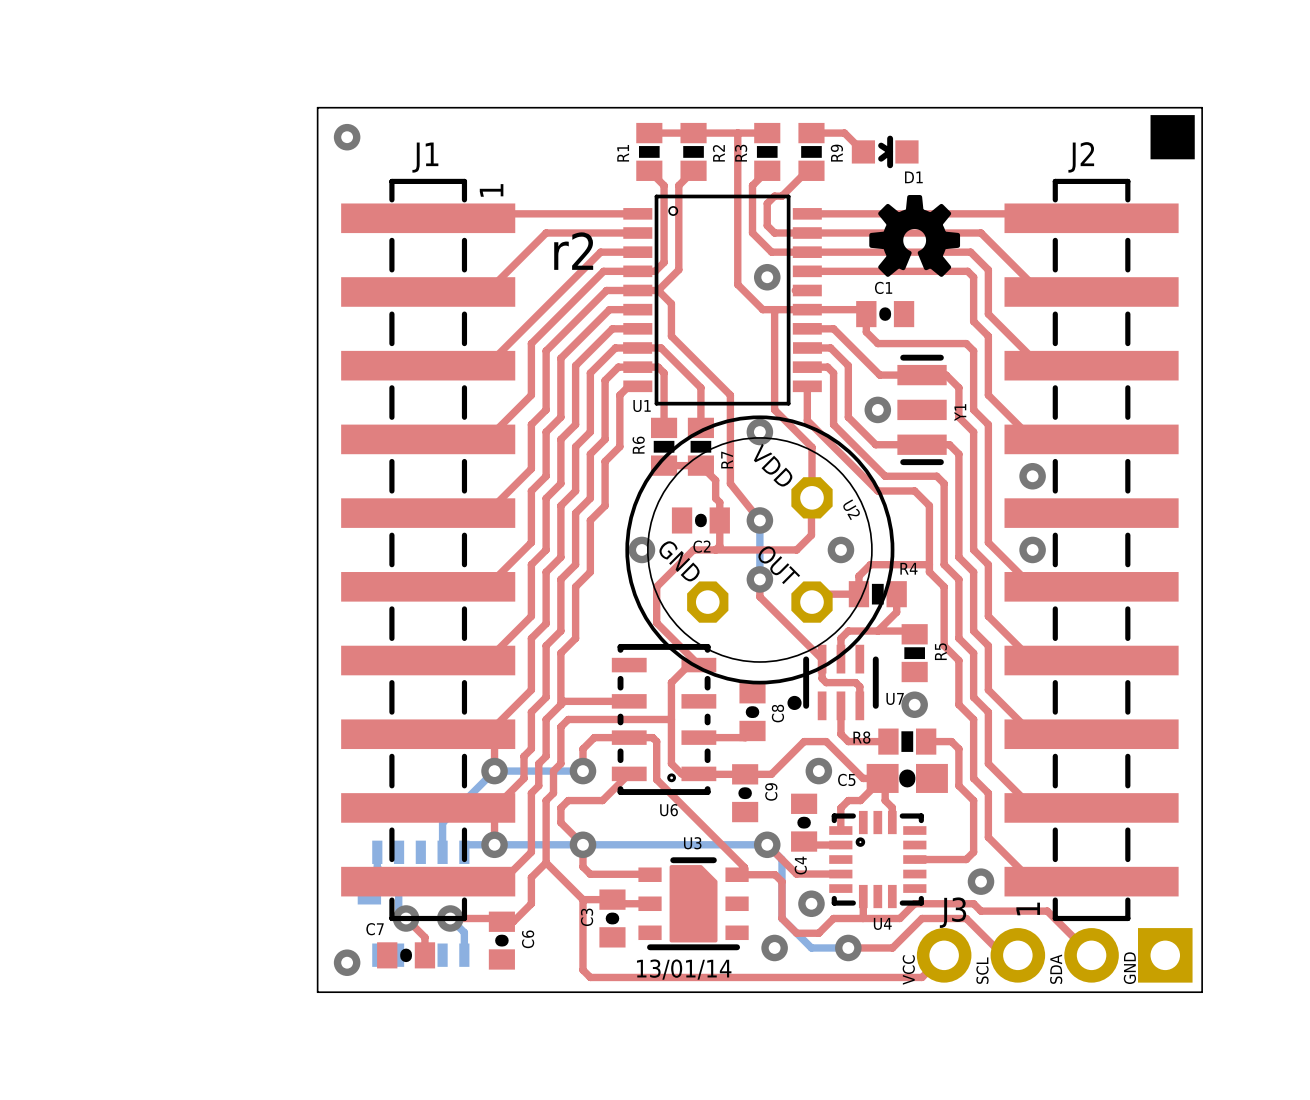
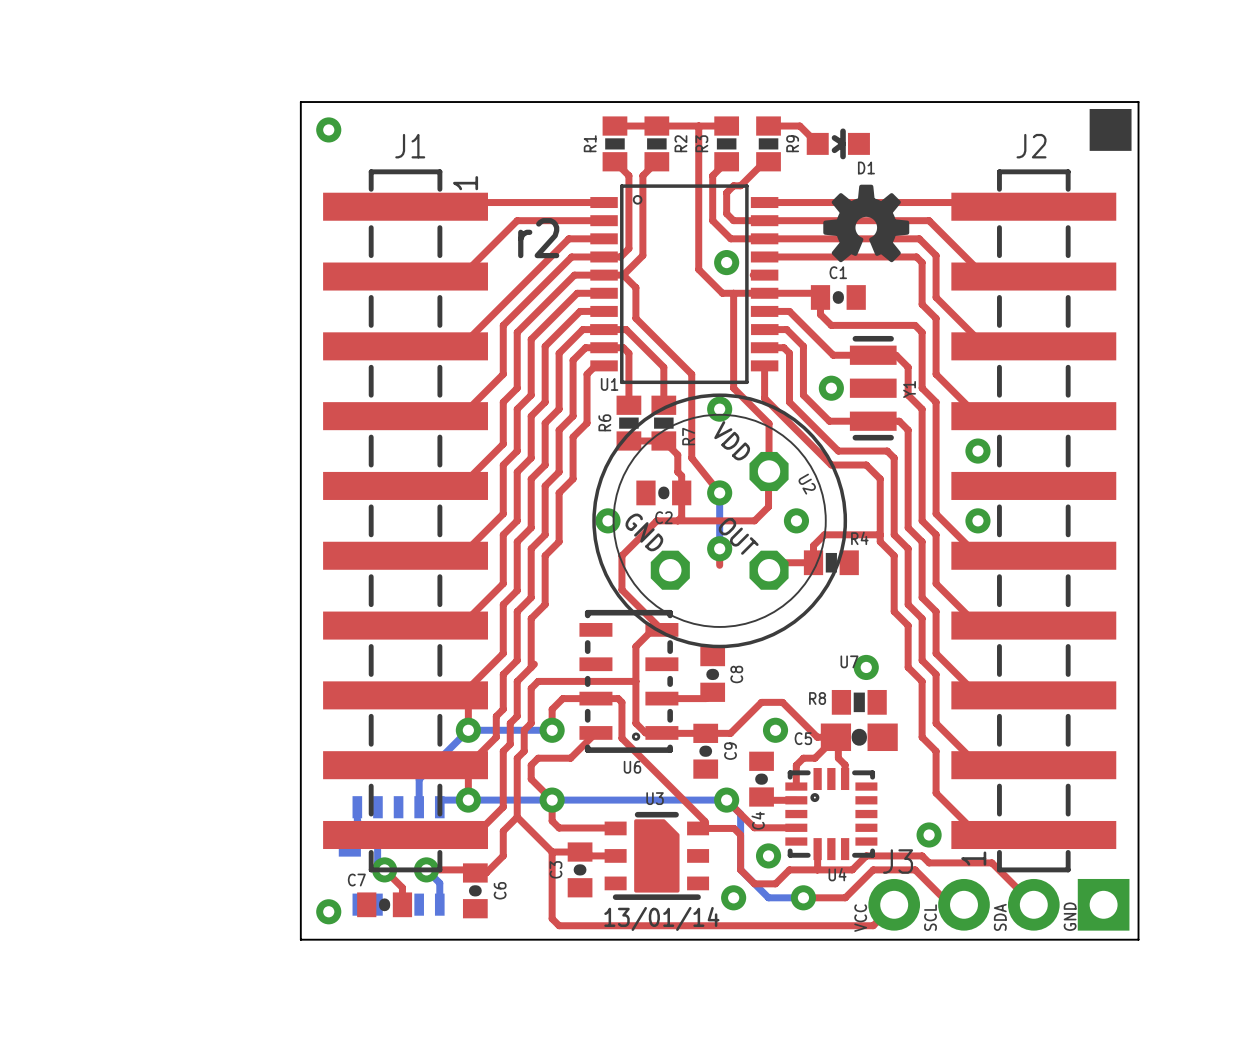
top track: (896, 594) (896, 612) (877, 631) -> none
top track: (759, 596) (822, 659) (822, 678) (826, 682) (855, 682) (859, 686) (859, 705) -> none
top track: (914, 634) (911, 631) (848, 631) (840, 638) (840, 659) -> none
R5: (914, 653) -> none
part: (833, 682) -> none
top track: (564, 701) (629, 701) -> none
top track: (840, 705) (840, 734) (848, 741) (888, 741) -> none
top track: (926, 741) (951, 741) (958, 748) (958, 785) (973, 800) (973, 852) (966, 859) (914, 859) -> none

